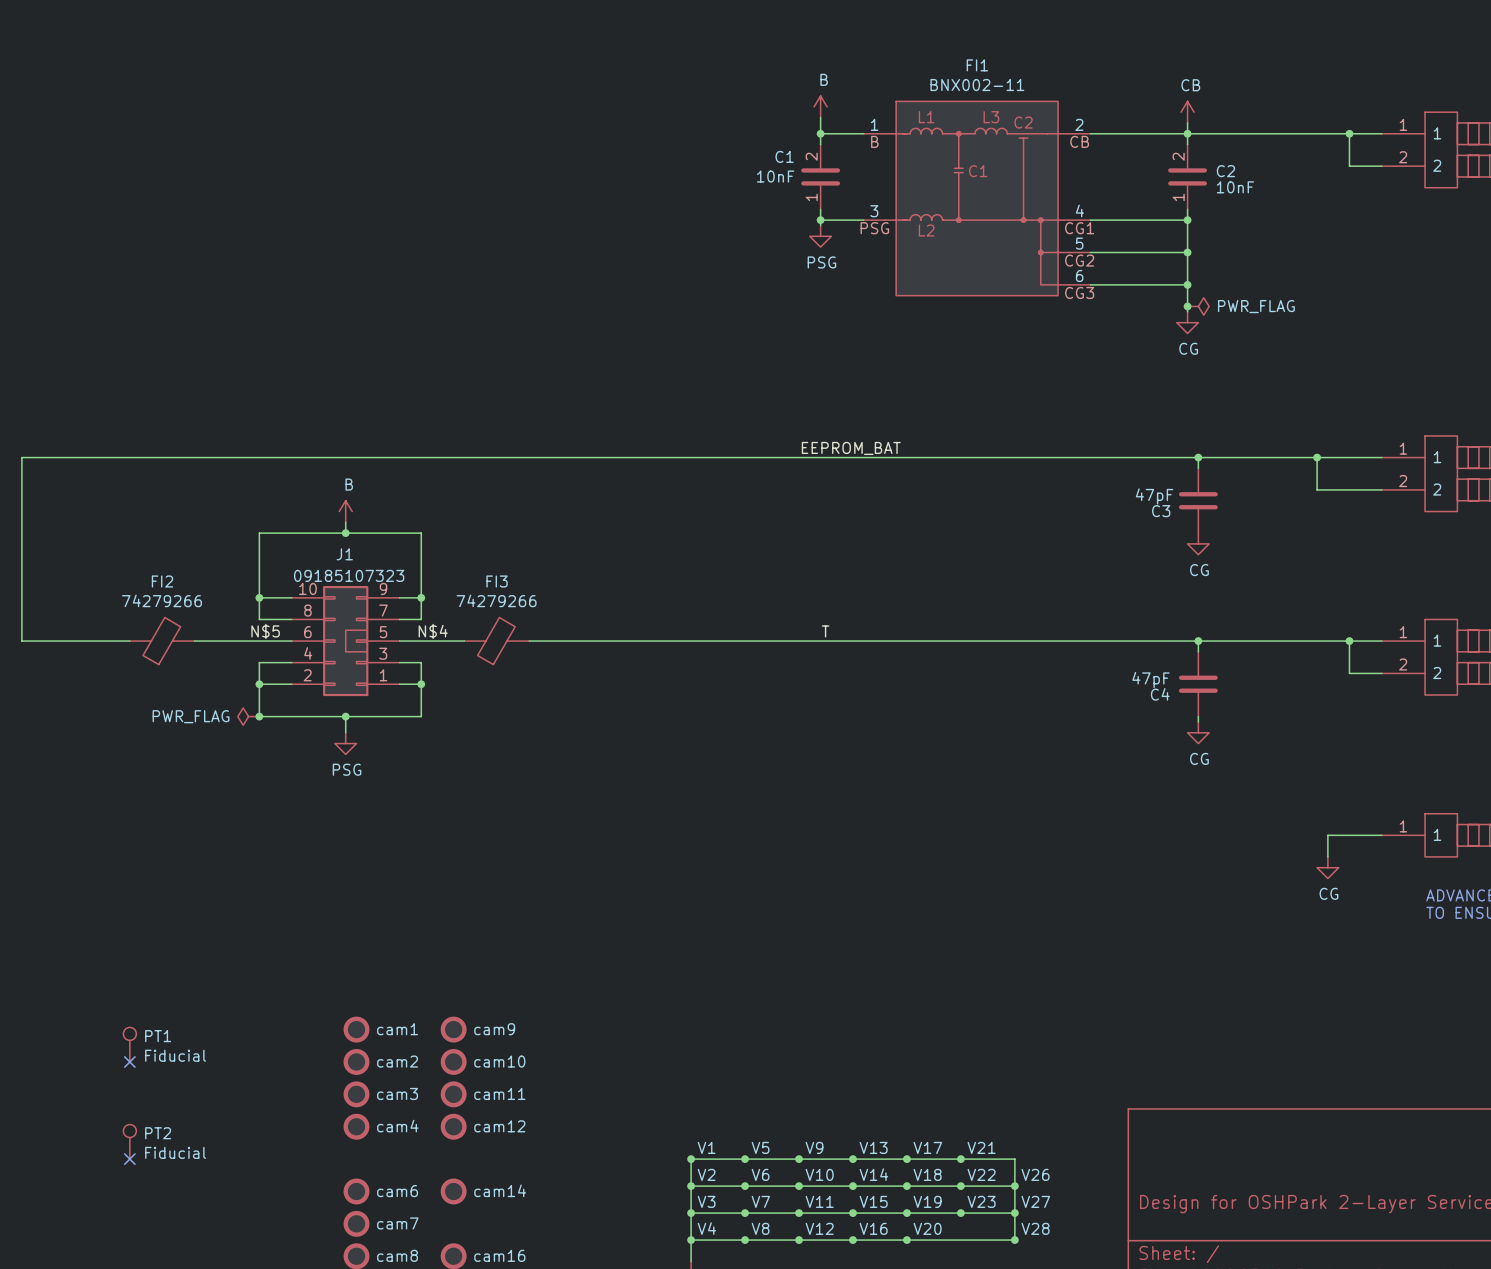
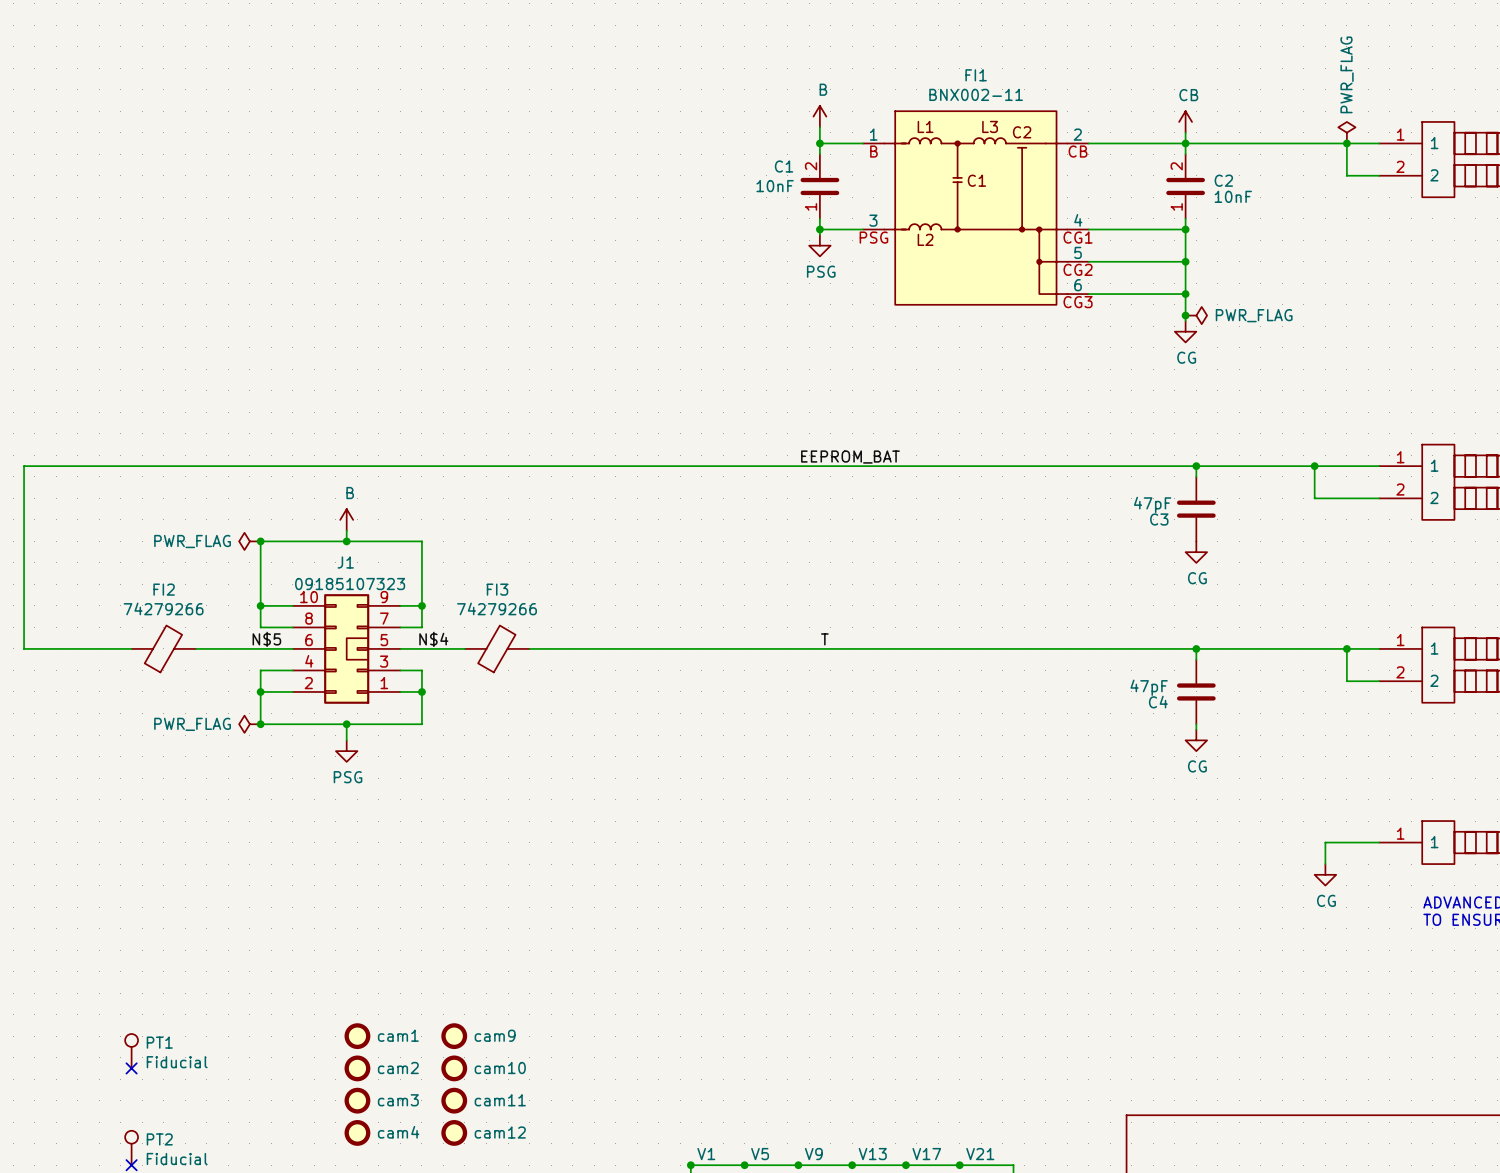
power symbol: none -> PWR_FLAG (1346, 132)
power symbol: none -> PWR_FLAG (249, 541)
junction: none -> (260, 541)

